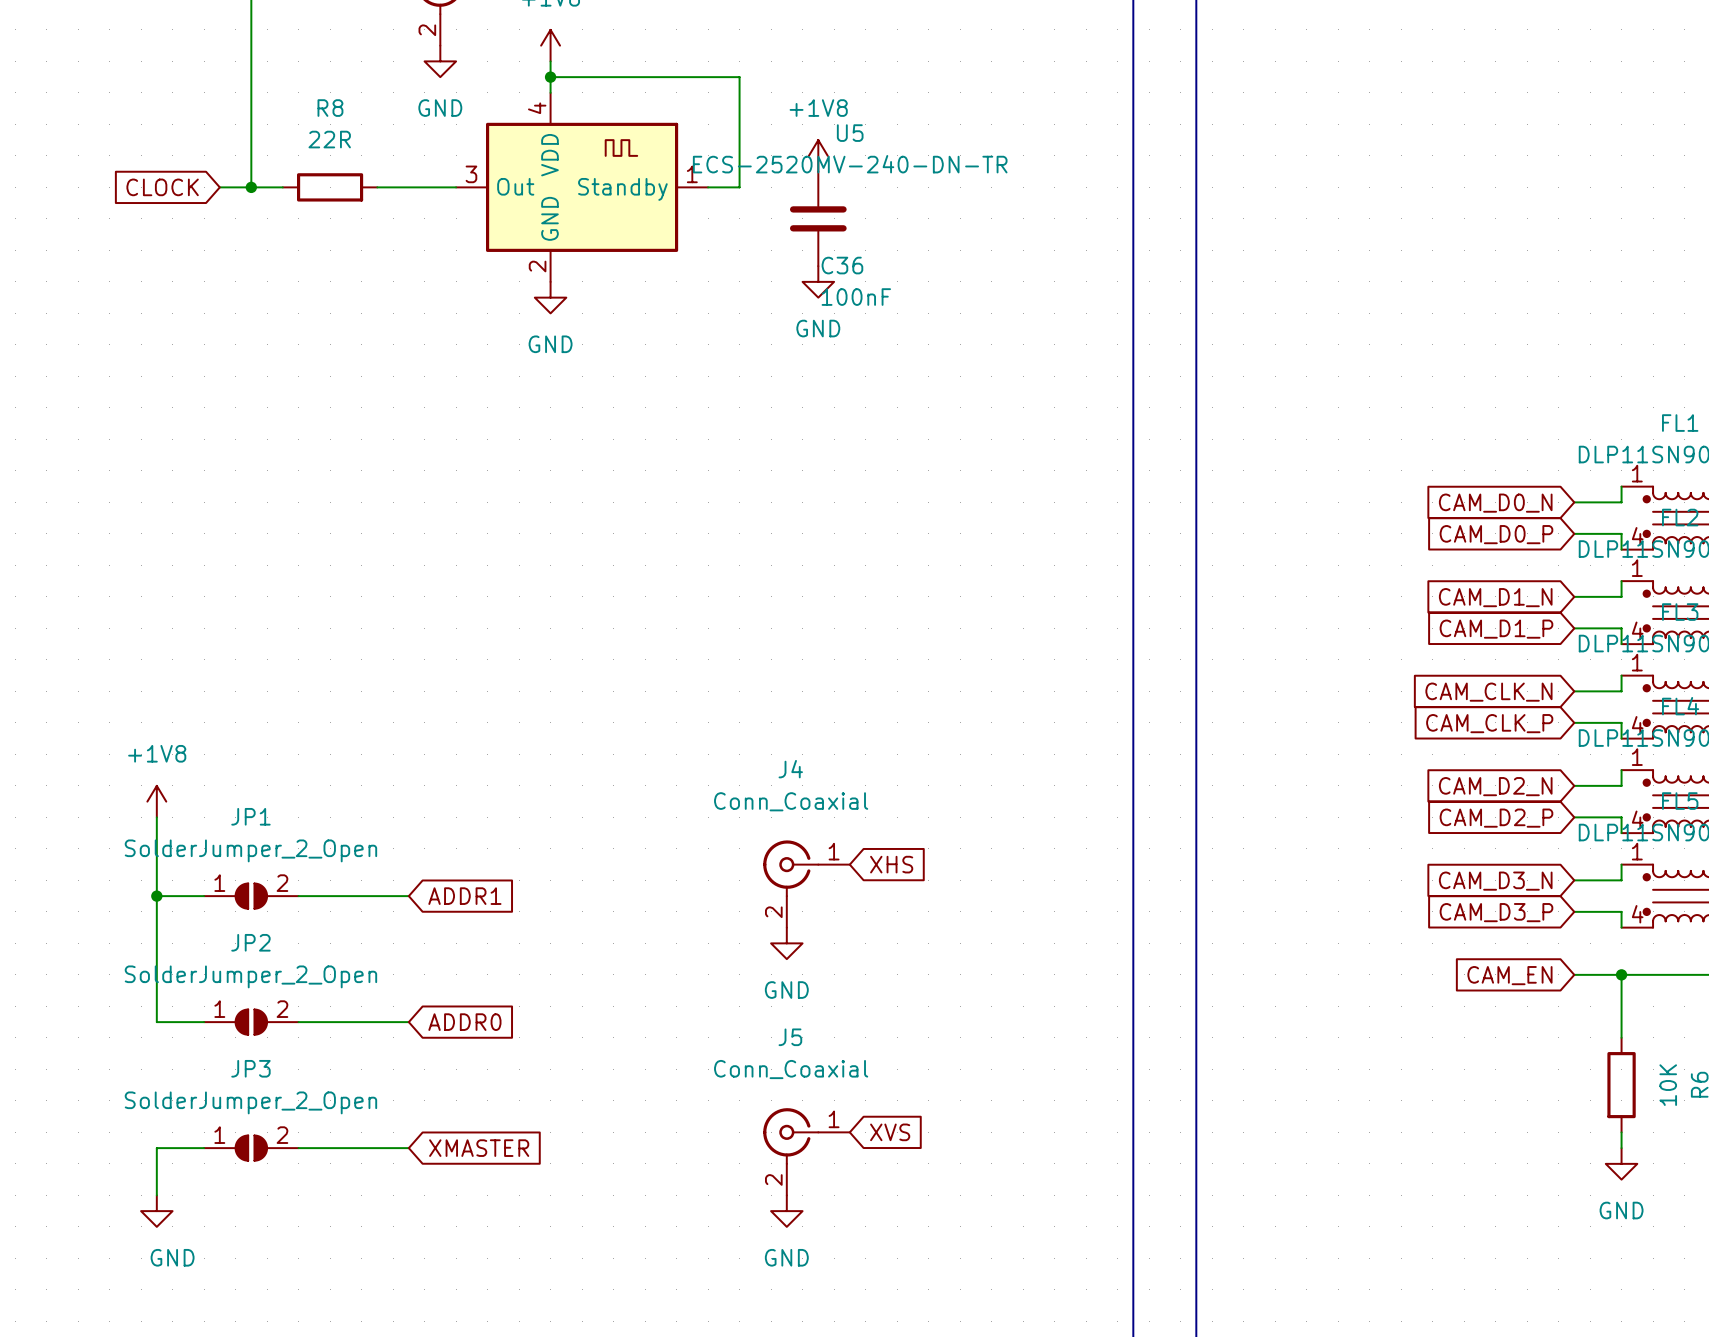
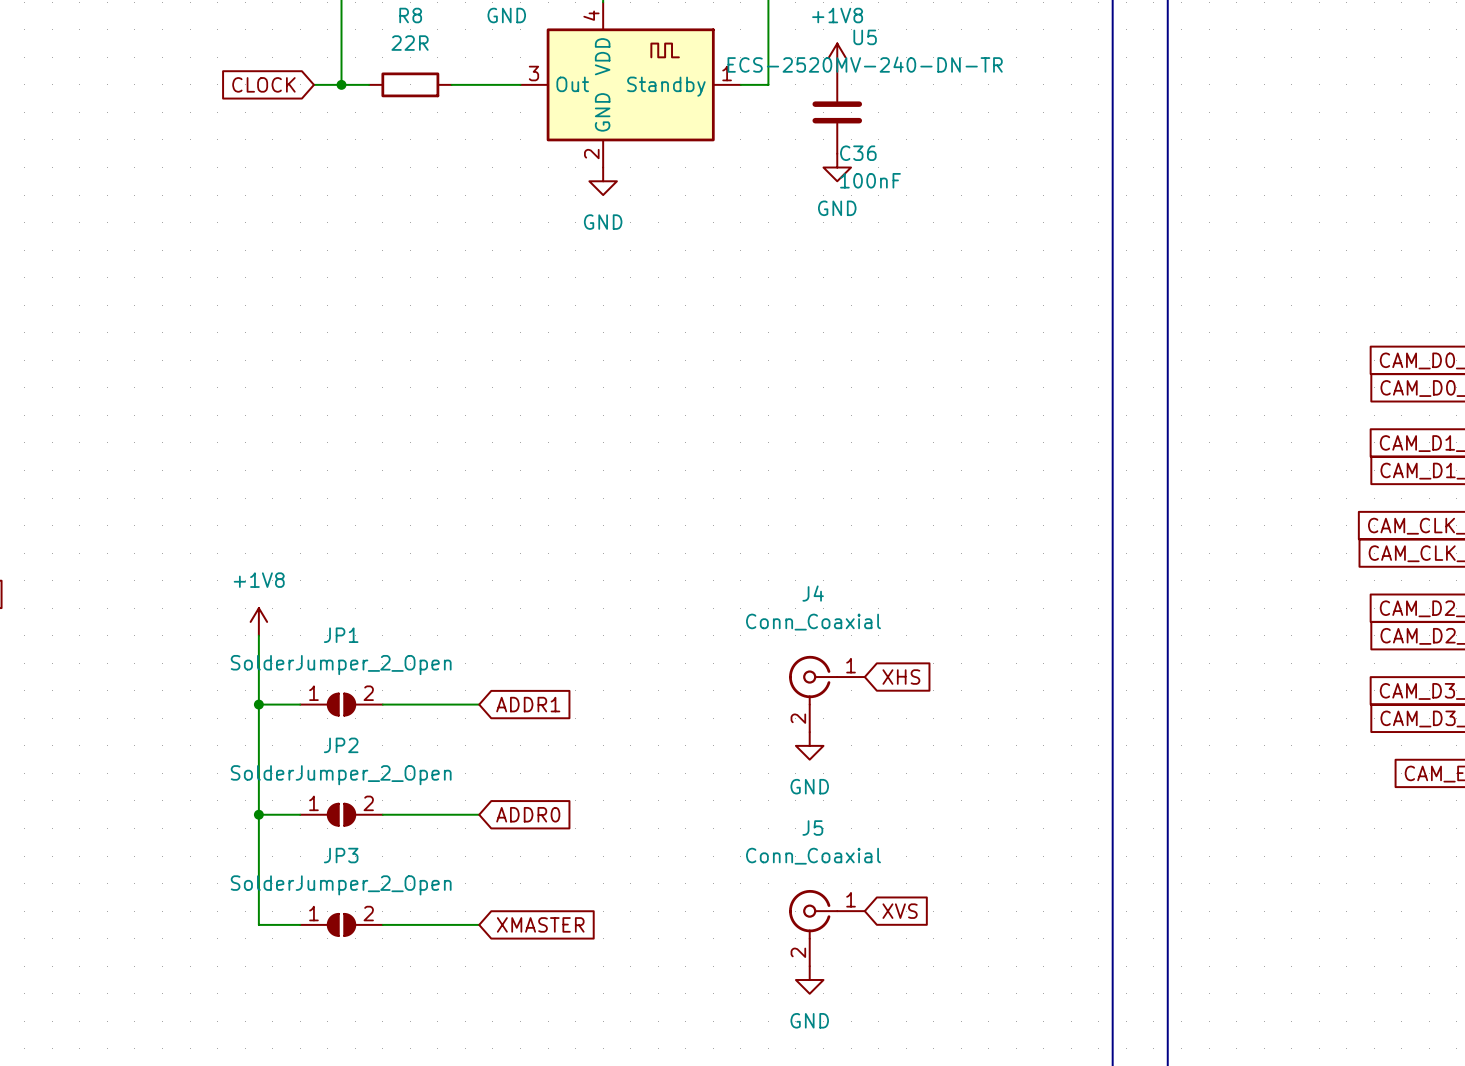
junction: none -> (258, 814)
wire: (156, 1148) (156, 1195) -> (258, 924) (258, 814)
power symbol: GND (156, 1211) -> none

